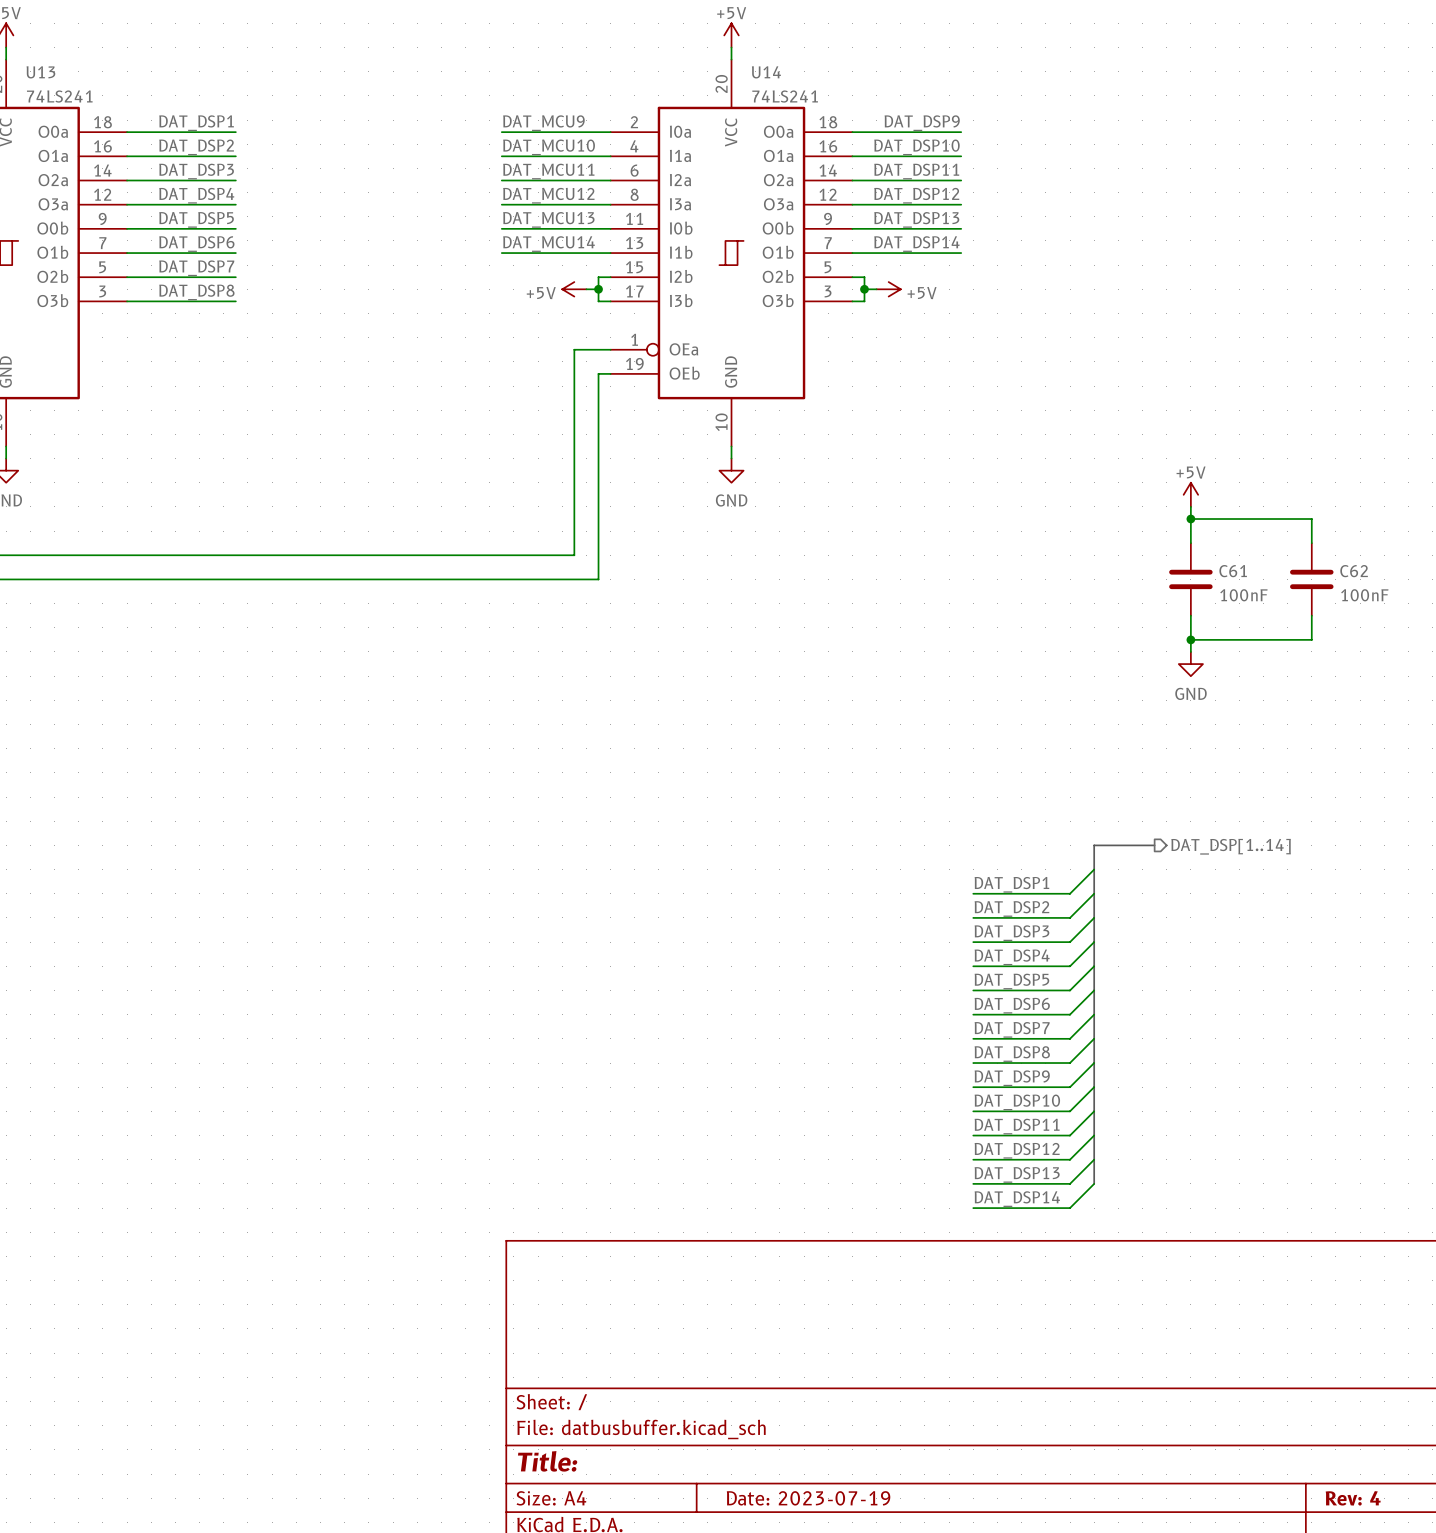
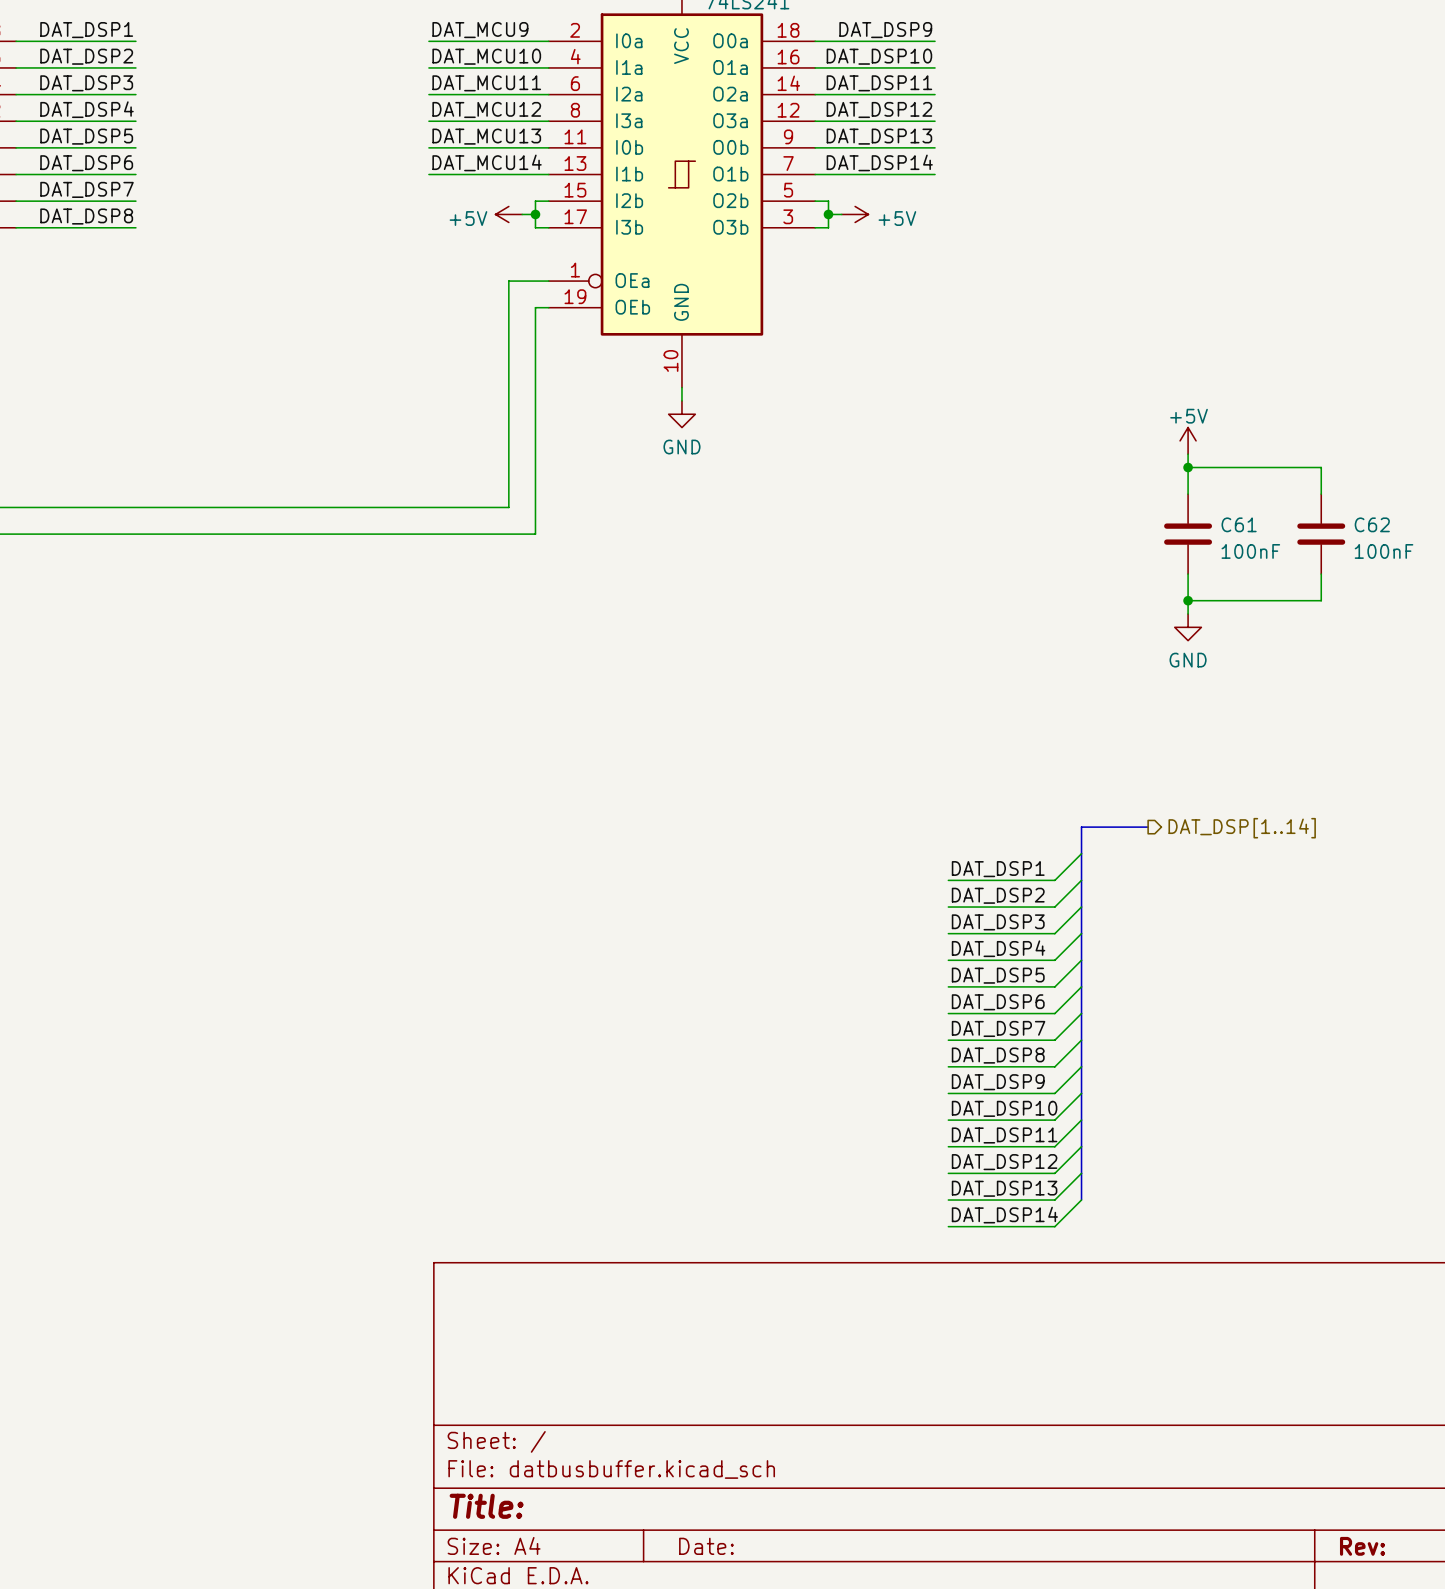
title block: Date: 2023-07-19 (808, 1498) -> Date: (706, 1546)
title block: Rev: 4 (1353, 1498) -> Rev: (1362, 1546)

